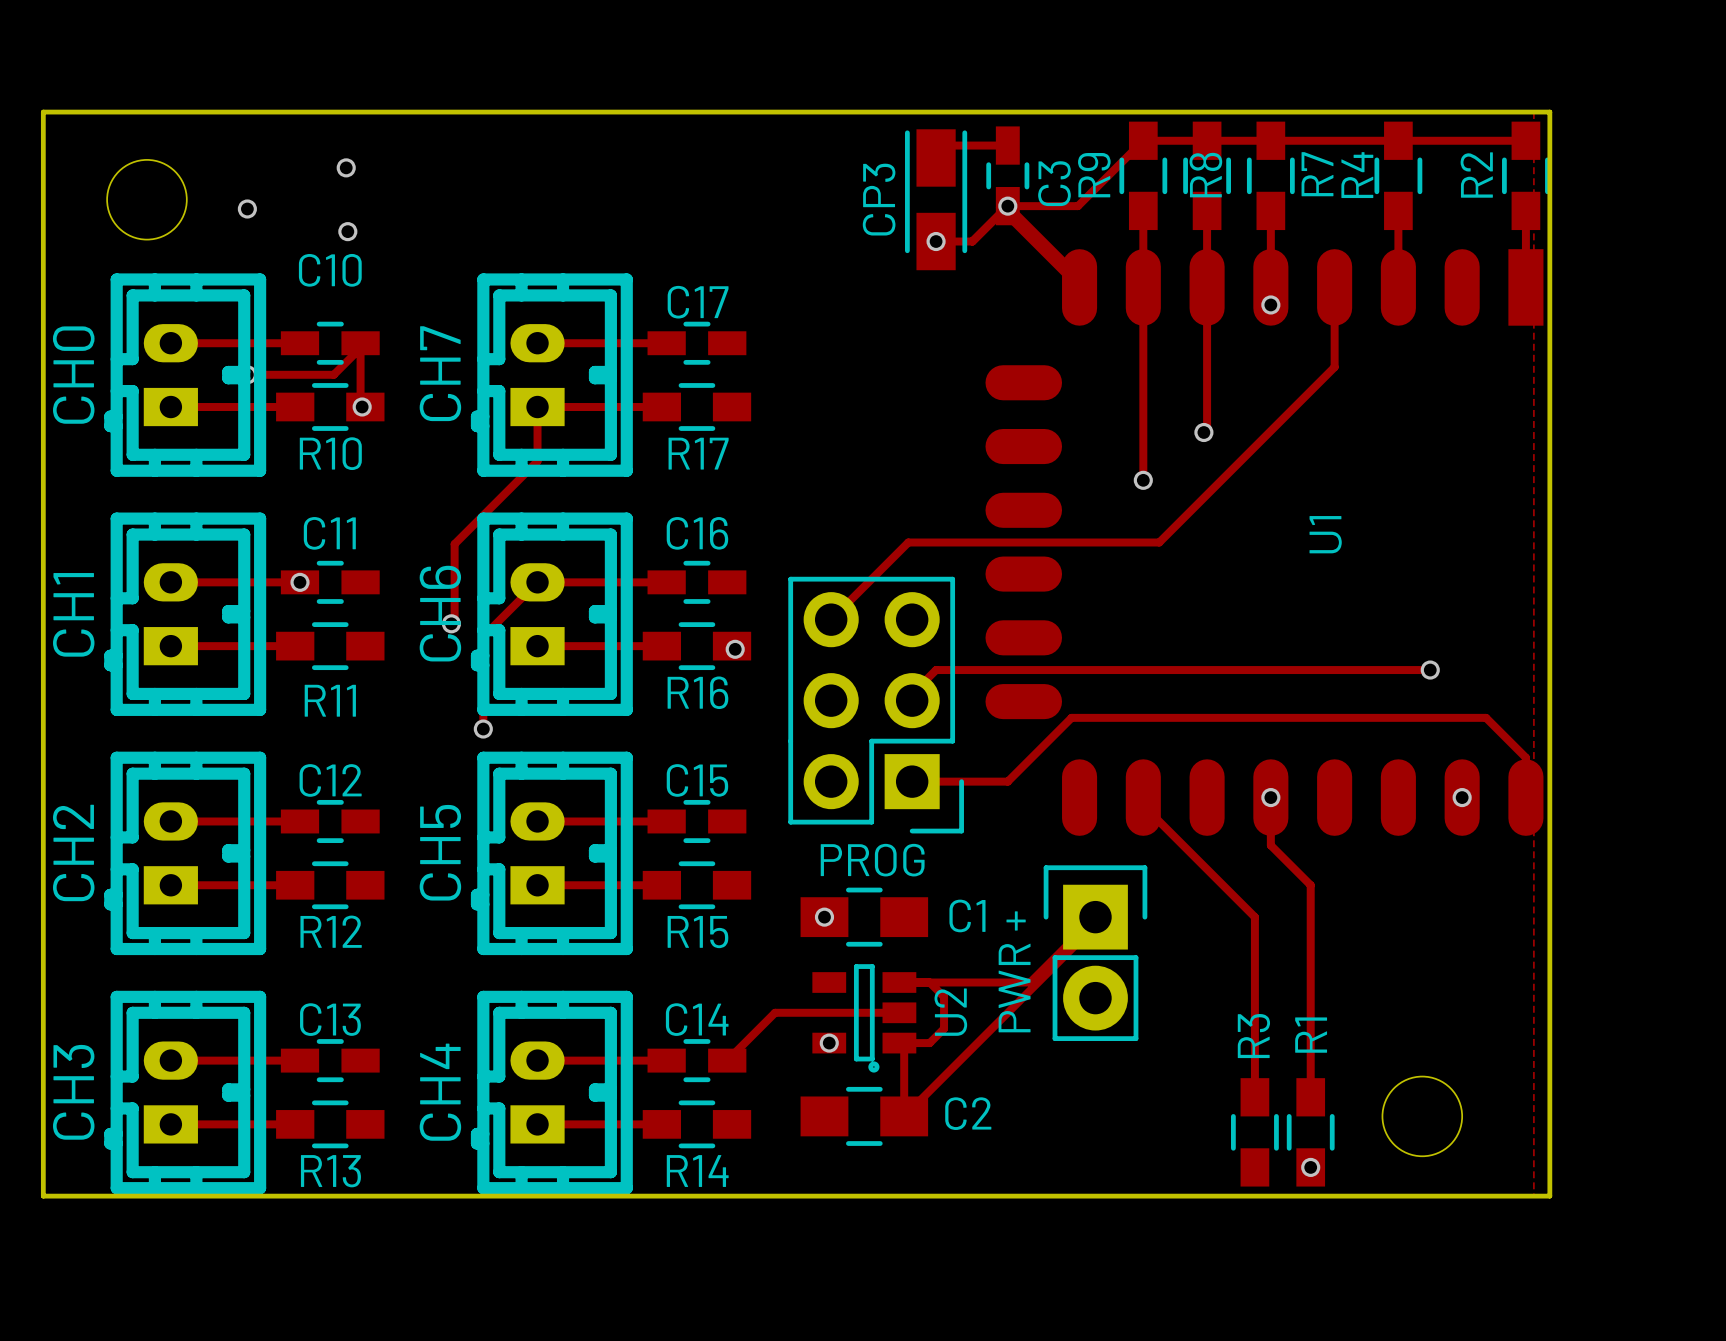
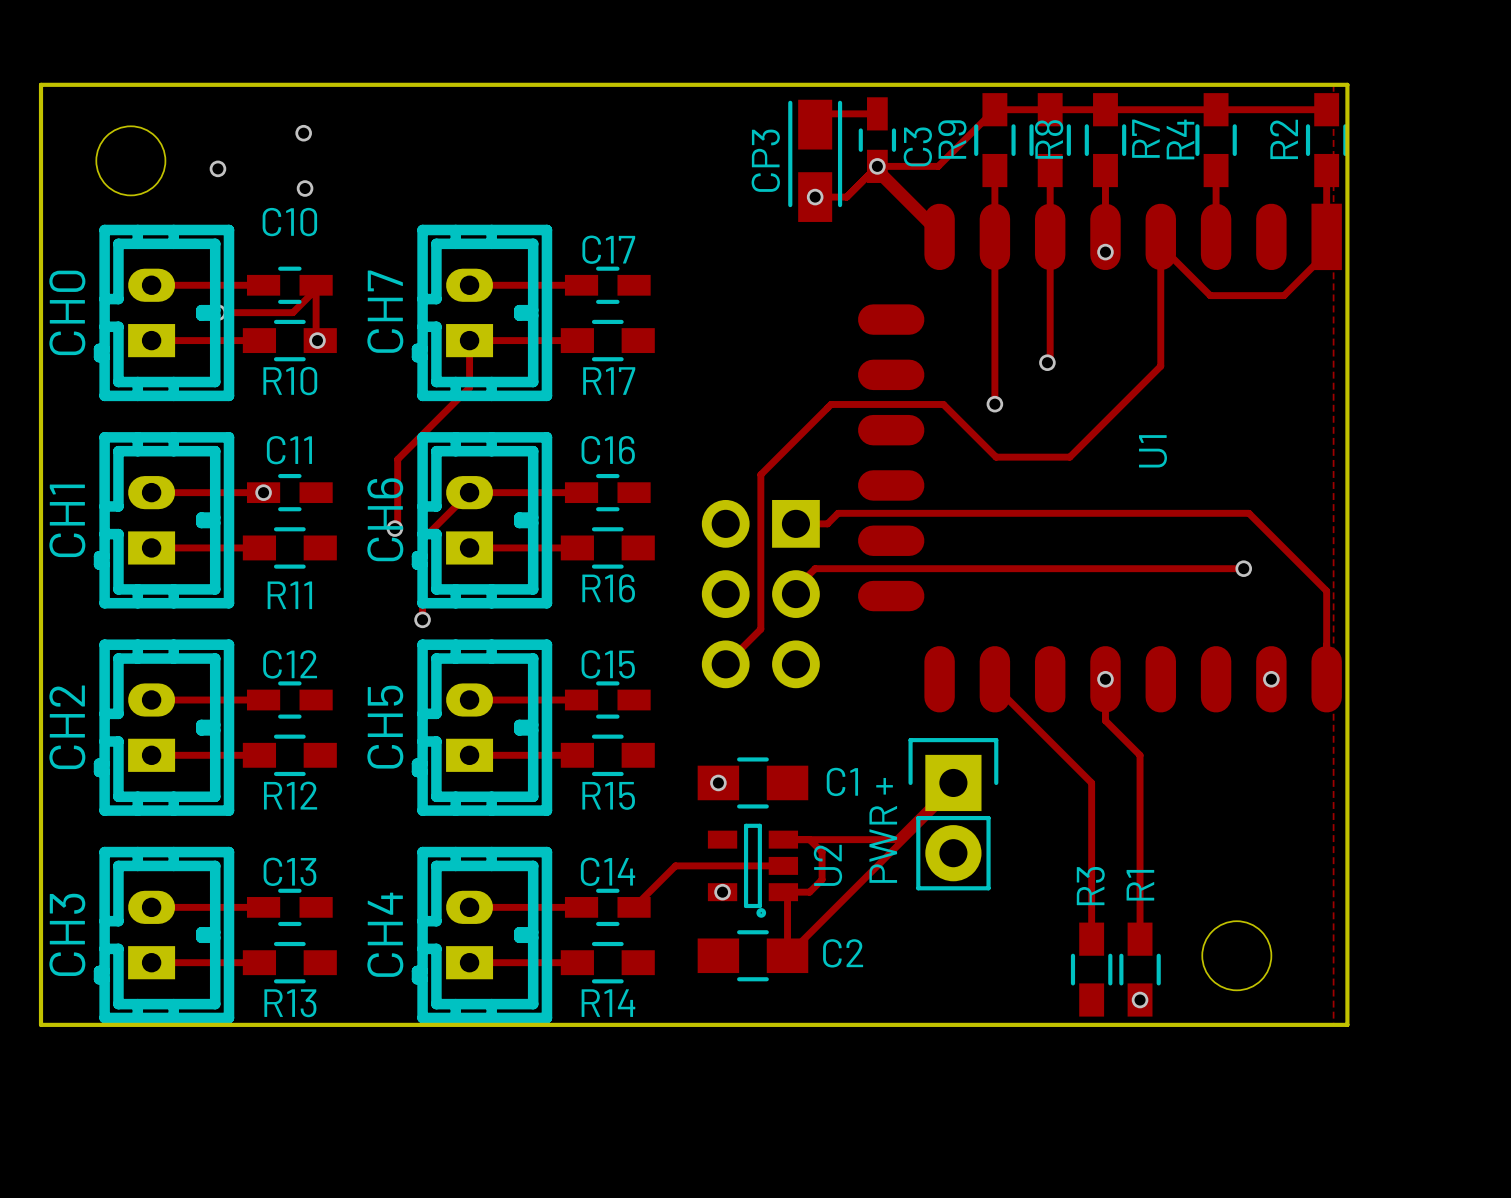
track: none -> (1326, 236) (1326, 252) (1284, 295) (1210, 295) (1160, 246)
track: (1334, 367) (1159, 542) (908, 542) (831, 619) -> (1160, 306) (1160, 366) (1069, 457) (996, 457) (943, 404) (831, 404) (760, 474) (760, 629) (725, 664)
via: (735, 649) -> none
PROG side: top (876, 705) -> bottom (760, 594)
track: (1525, 757) (1486, 717) (1071, 717) (1007, 781) (912, 781) -> (1326, 644) (1326, 591) (1248, 513) (838, 513) (827, 523) (795, 523)

